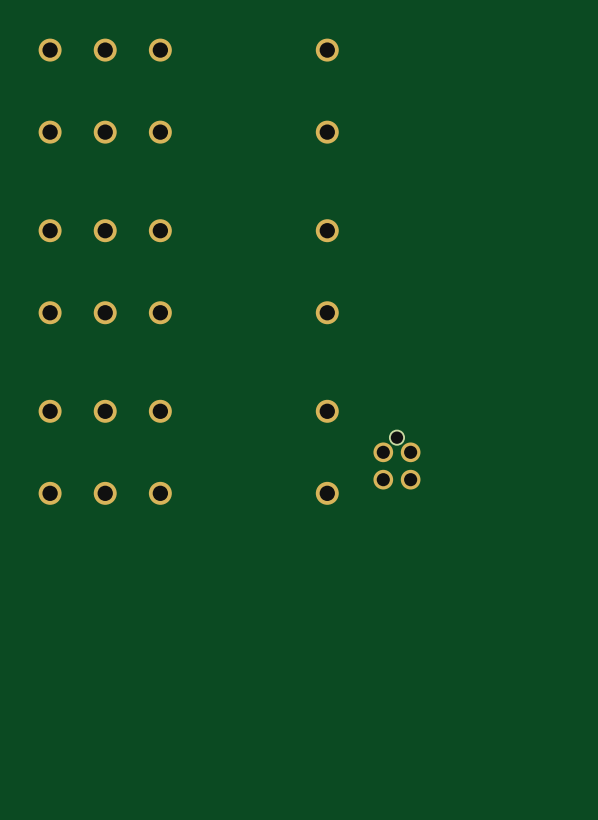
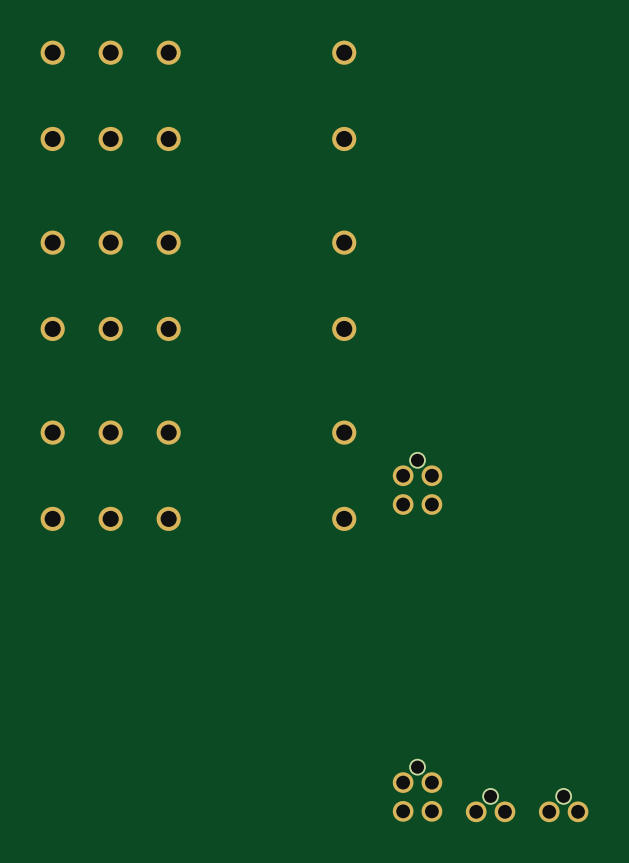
part: none -> (417, 790)
part: none -> (490, 805)
part: none -> (563, 805)

